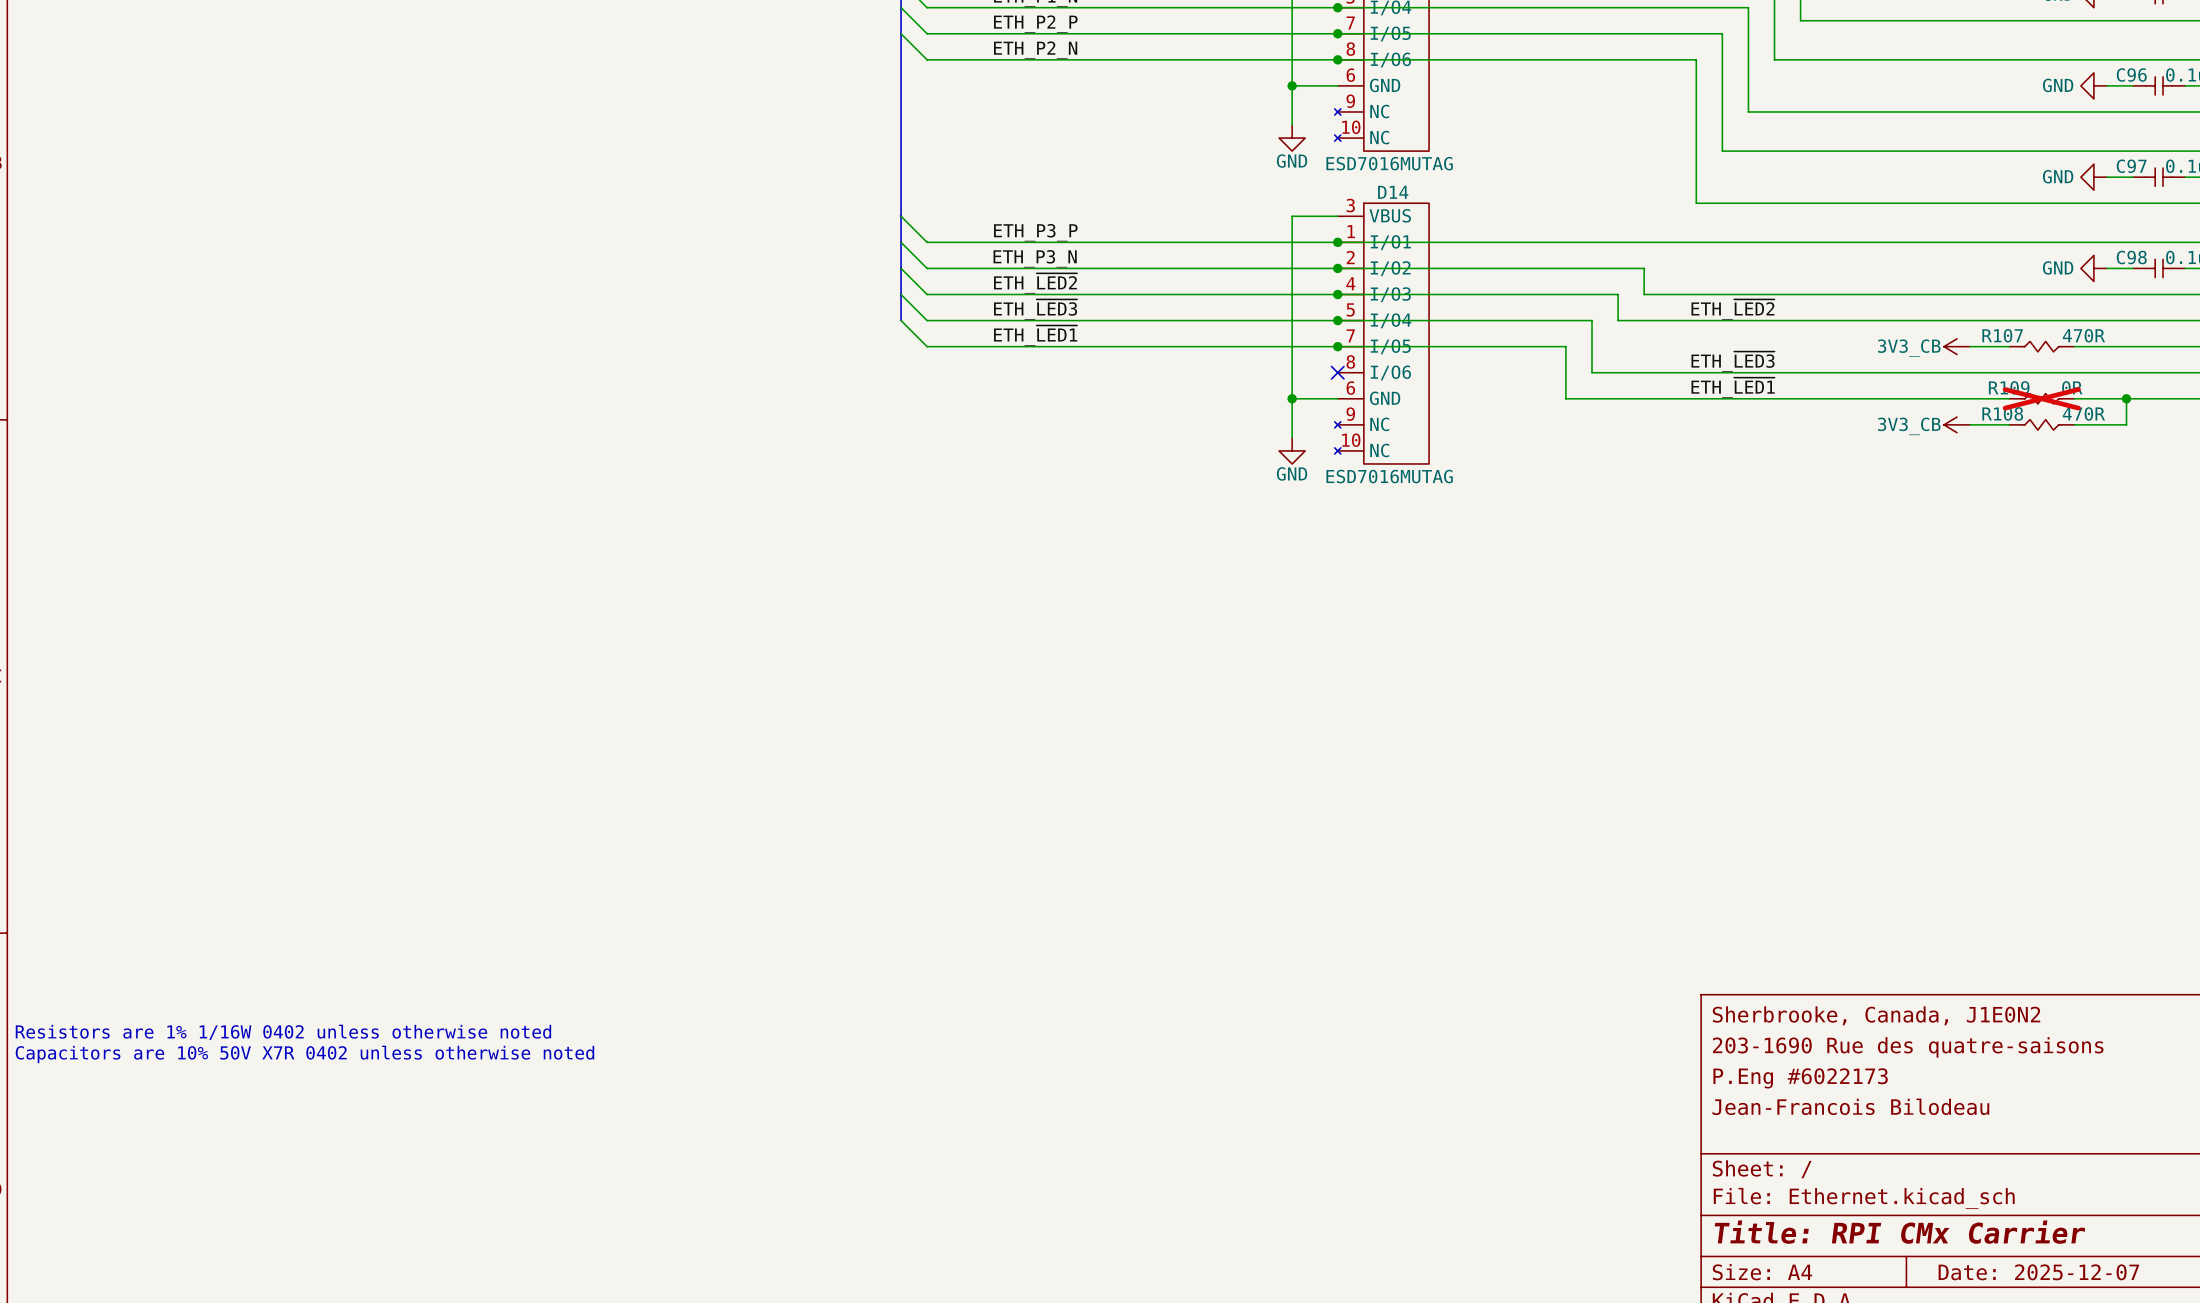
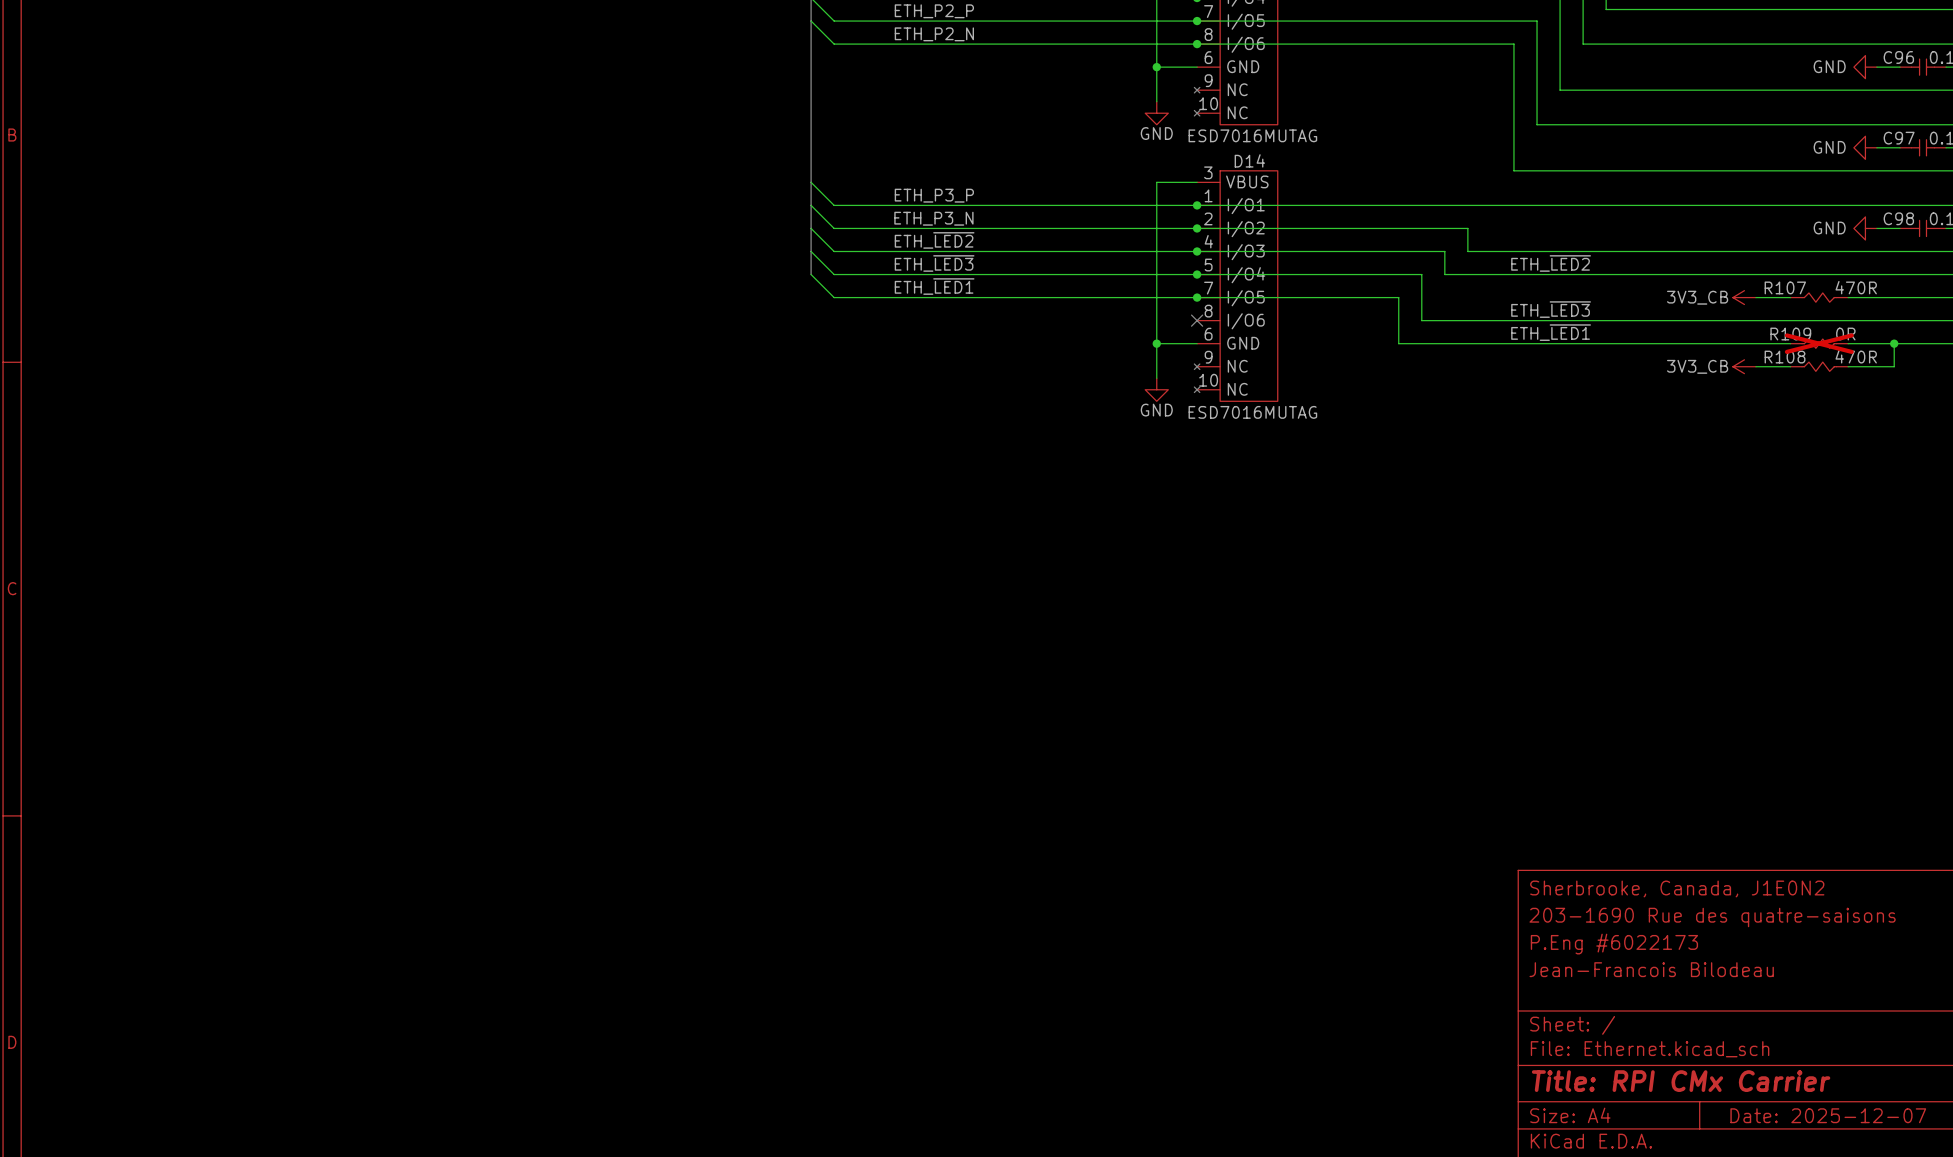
text: Resistors are 1% 1/16W 0402 unless otherwise noted (283, 1032) -> none
text: Capacitors are 10% 50V X7R 0402 unless otherwise noted (304, 1054) -> none

